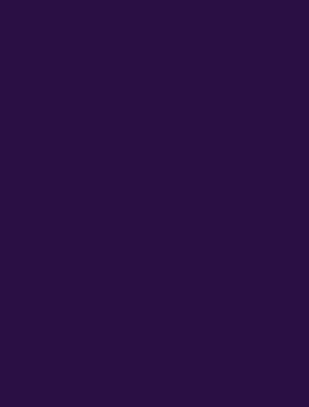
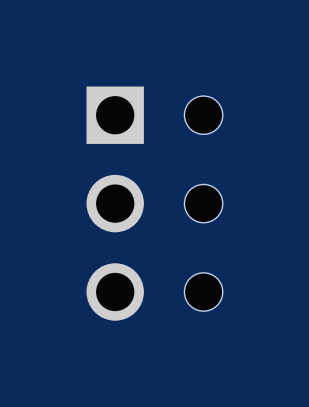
part: none -> (154, 203)

